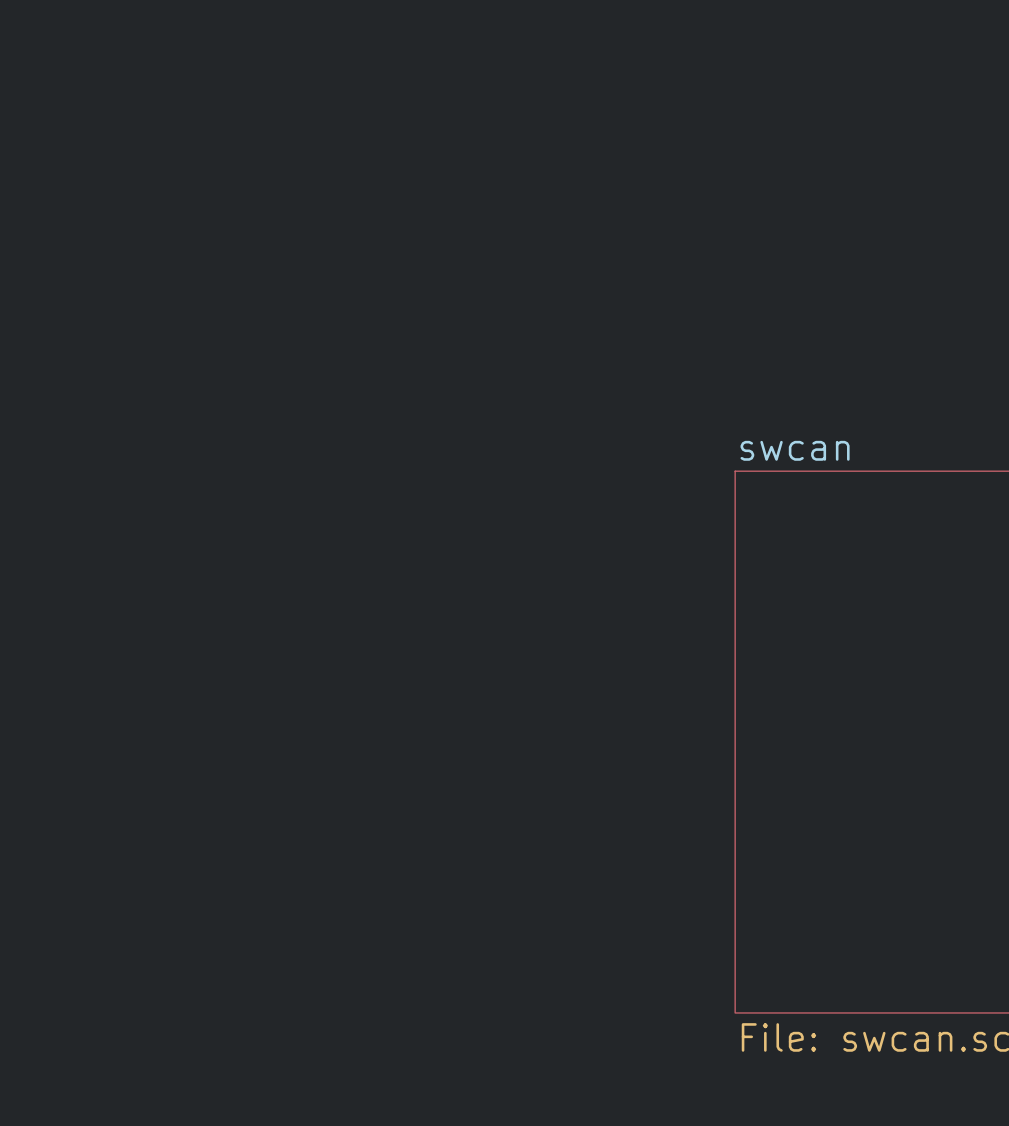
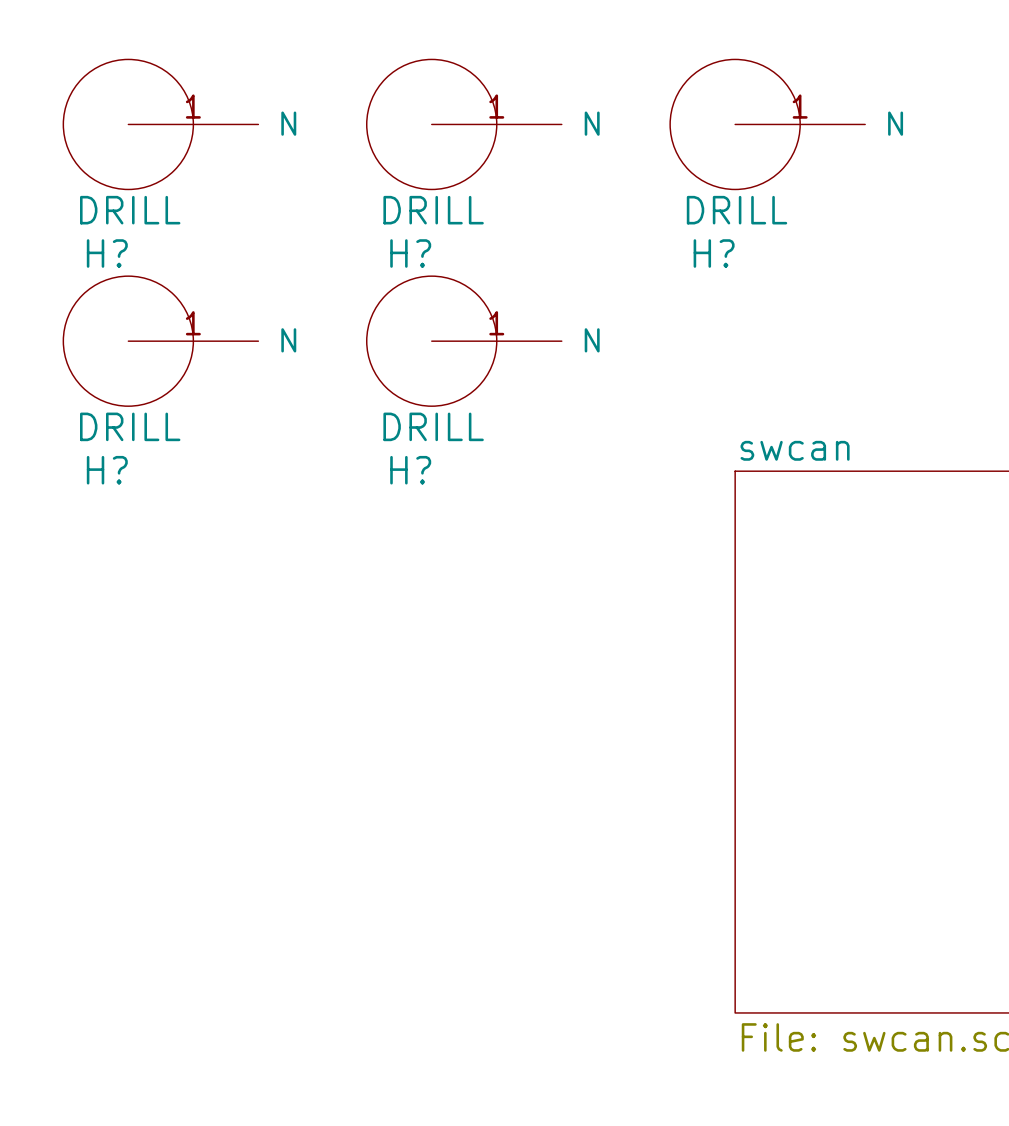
H?: none -> DRILL (160, 124)
H?: none -> DRILL (464, 124)
H?: none -> DRILL (767, 124)
H?: none -> DRILL (160, 341)
H?: none -> DRILL (464, 341)

